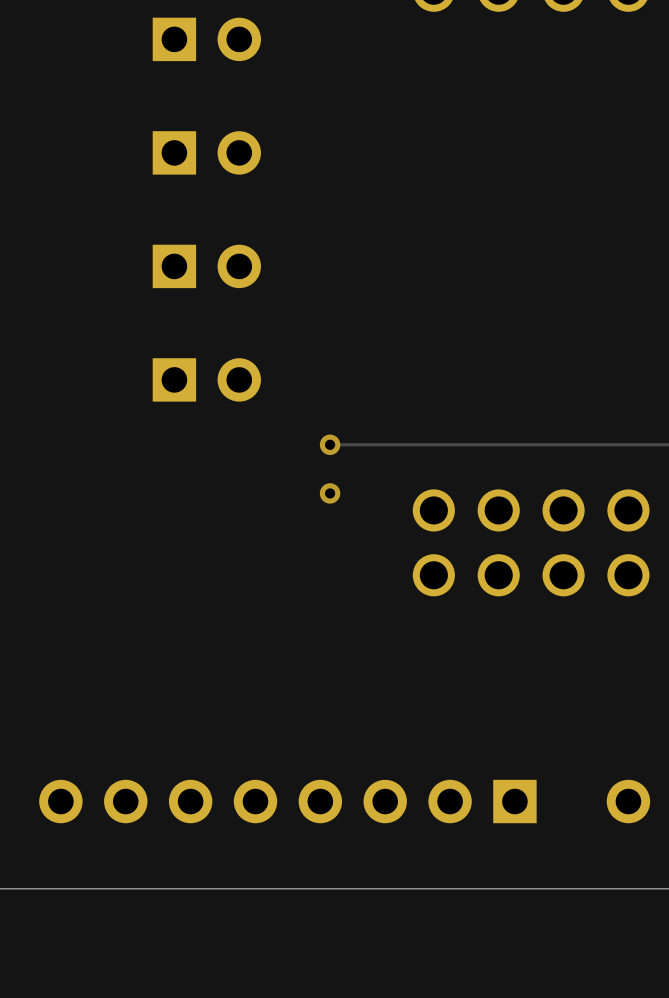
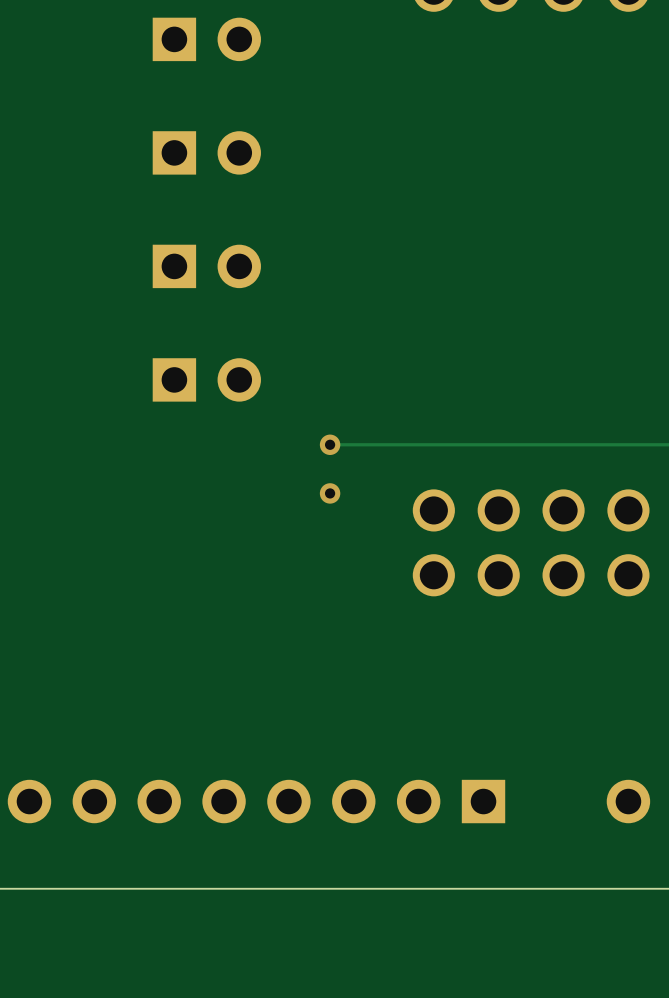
part position: (287, 801) -> (256, 801)

